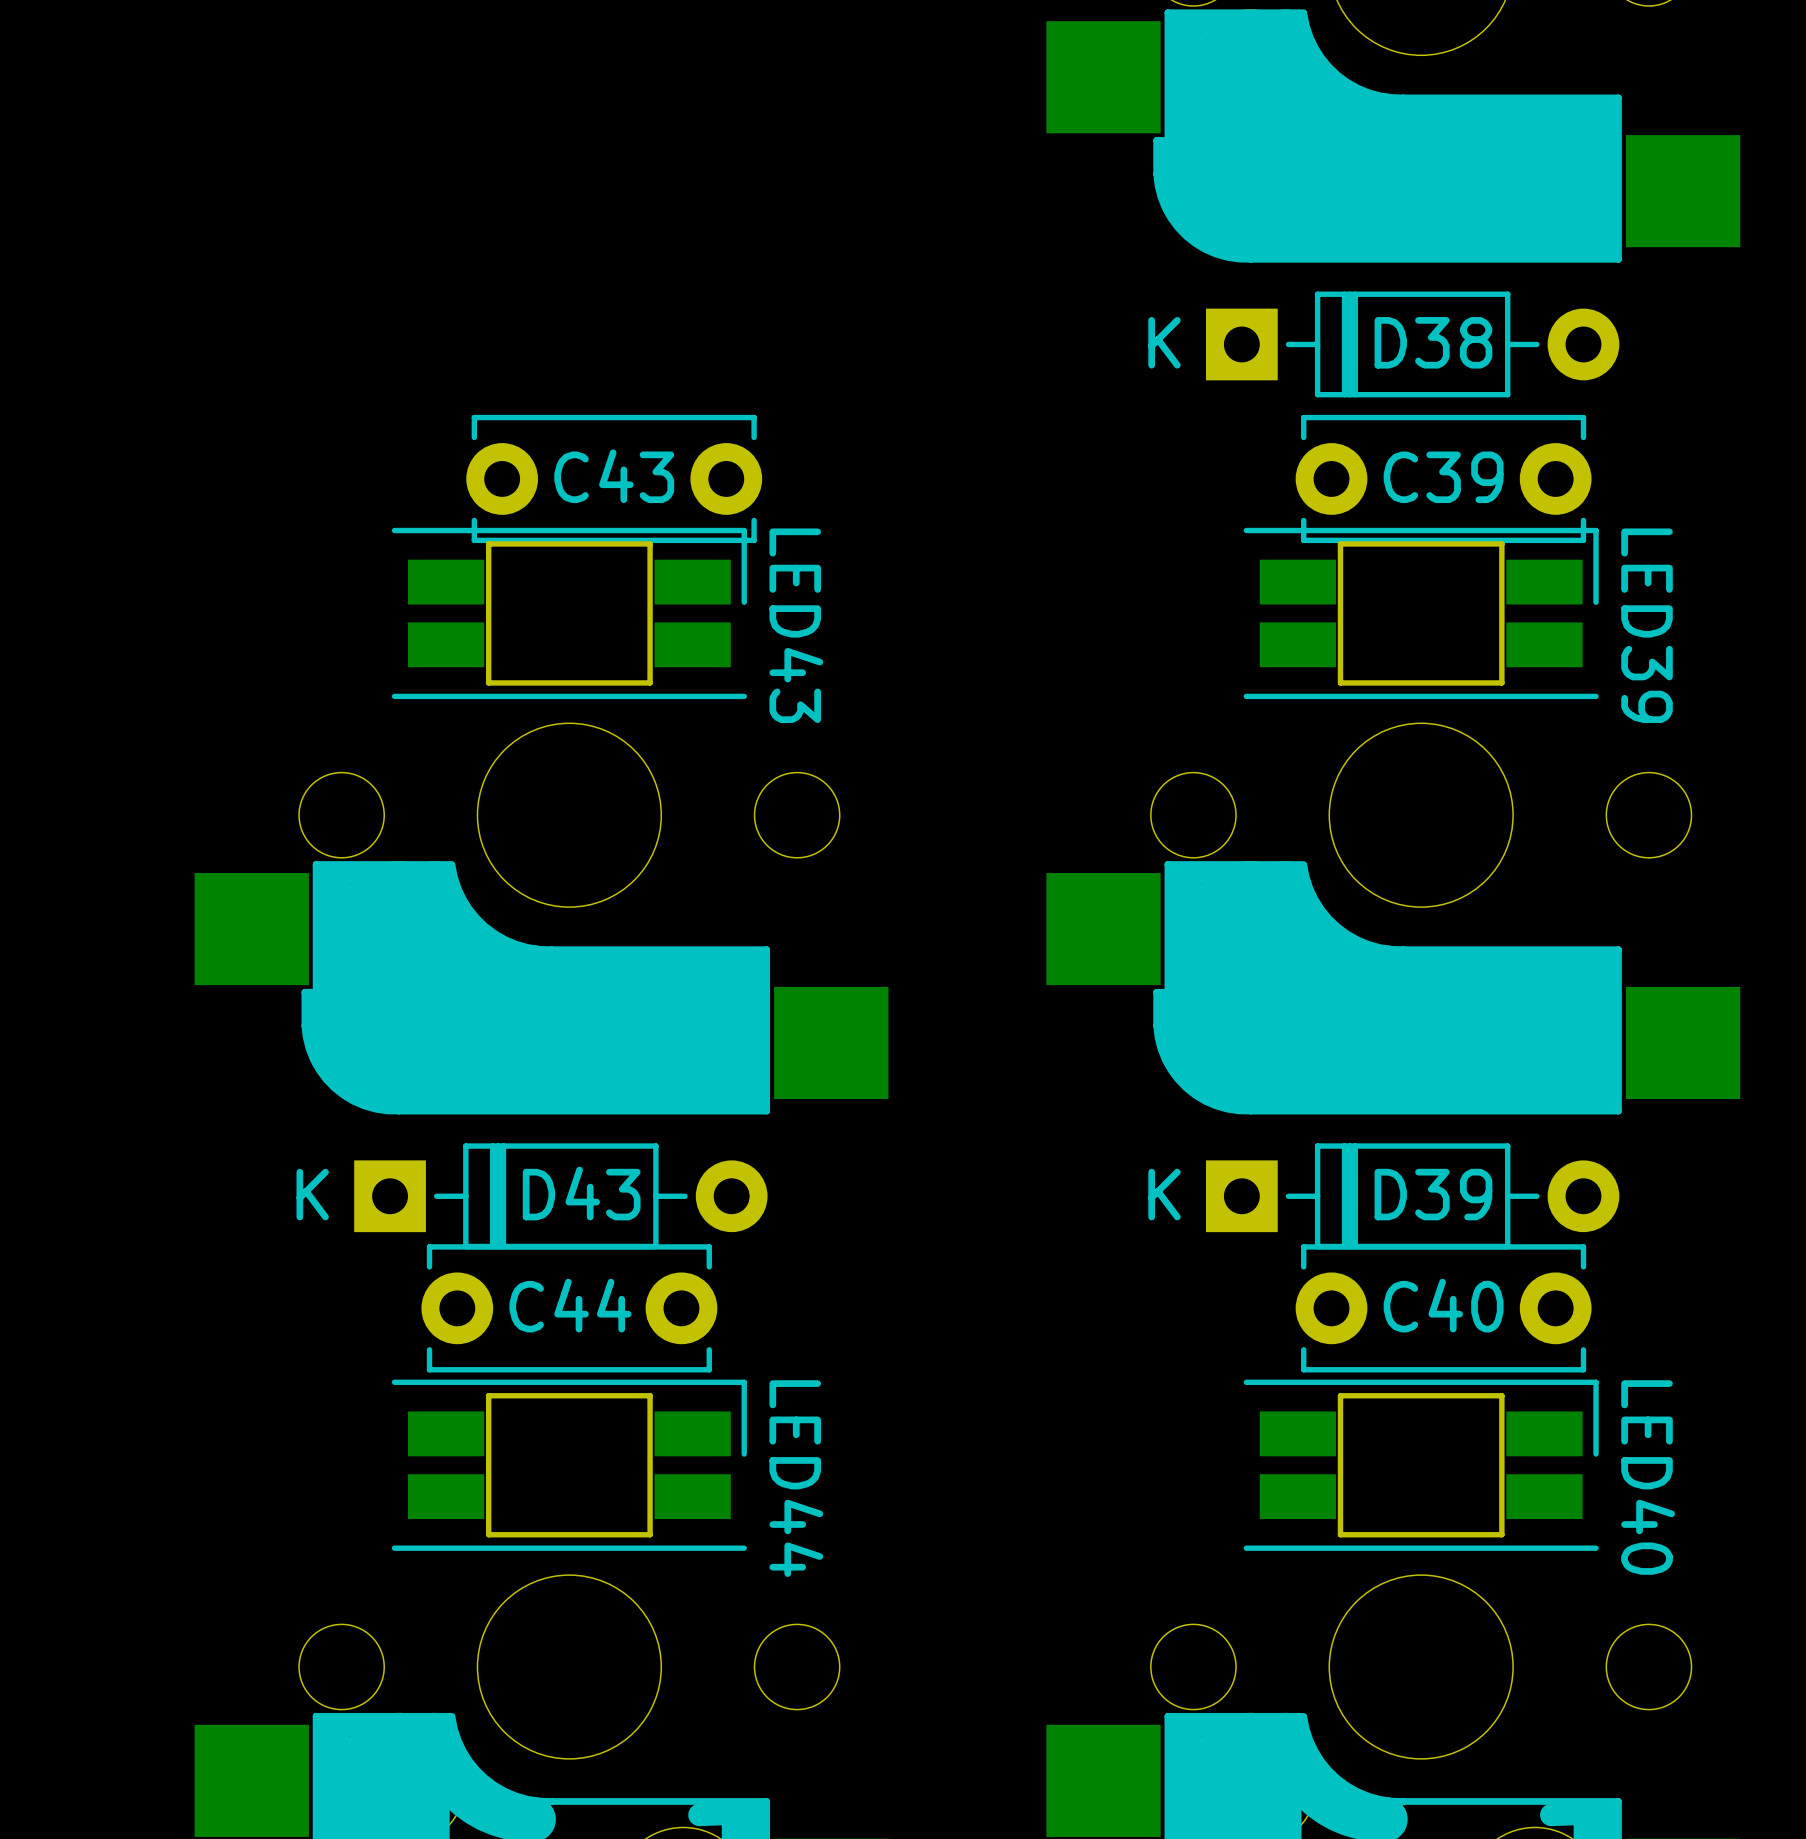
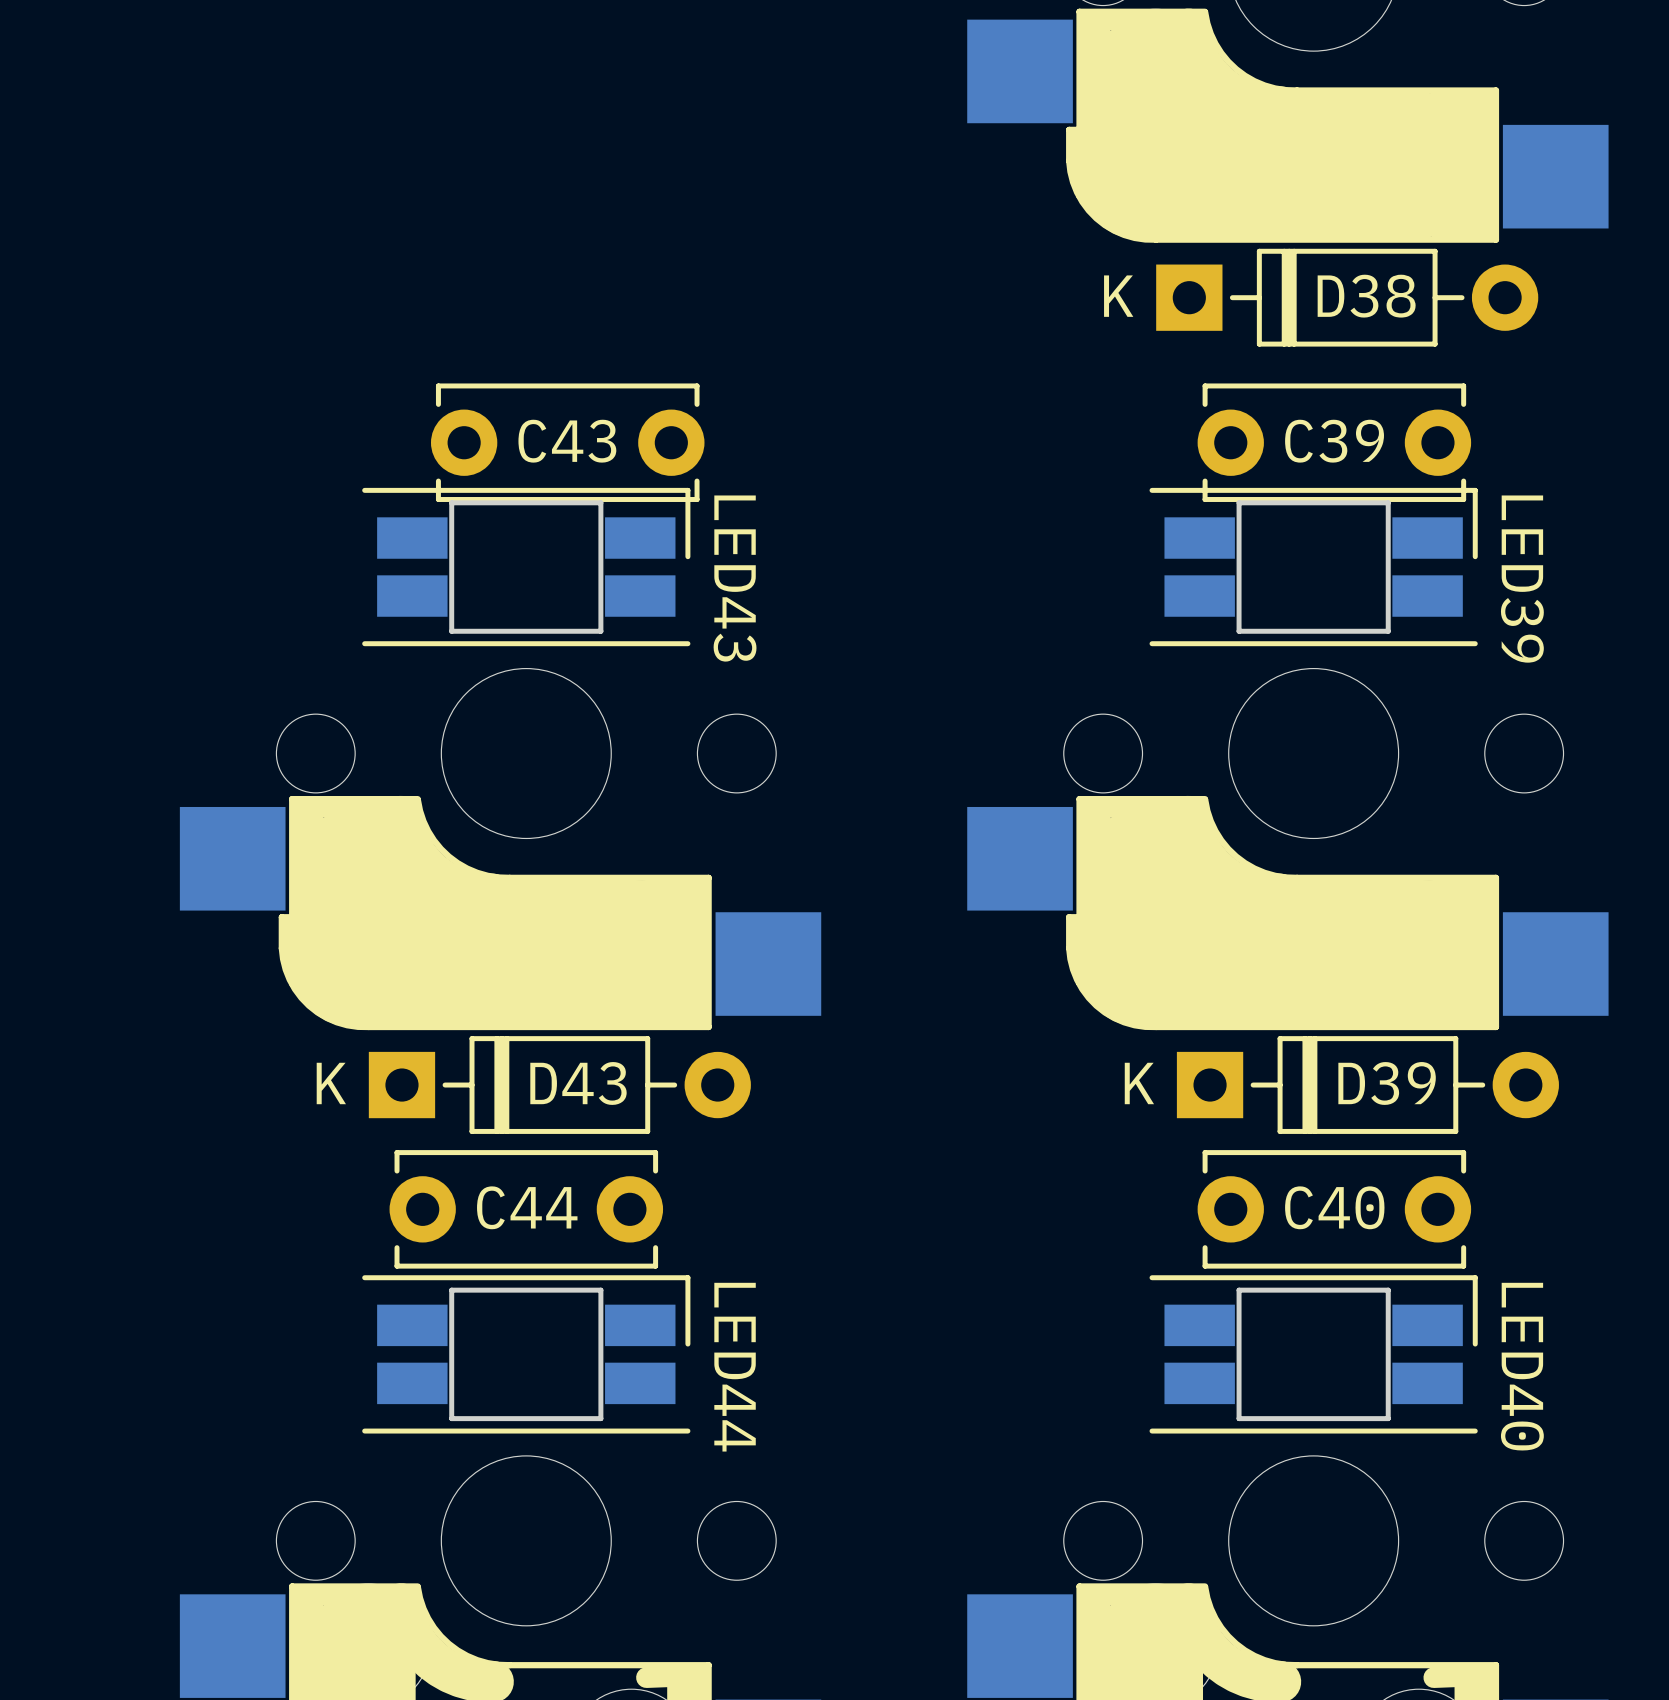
D38 position: (1412, 344) -> (1347, 297)
D43 position: (560, 1196) -> (559, 1085)
D39 position: (1412, 1196) -> (1367, 1085)

